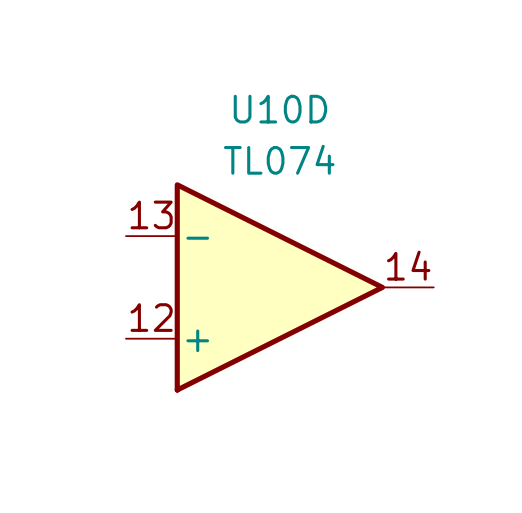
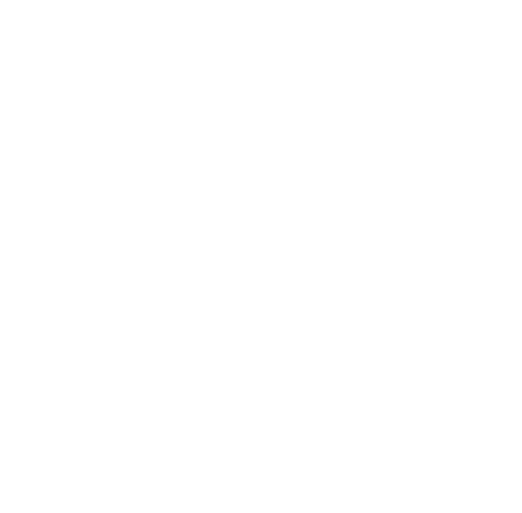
U10D: TL074 (279, 287) -> none

